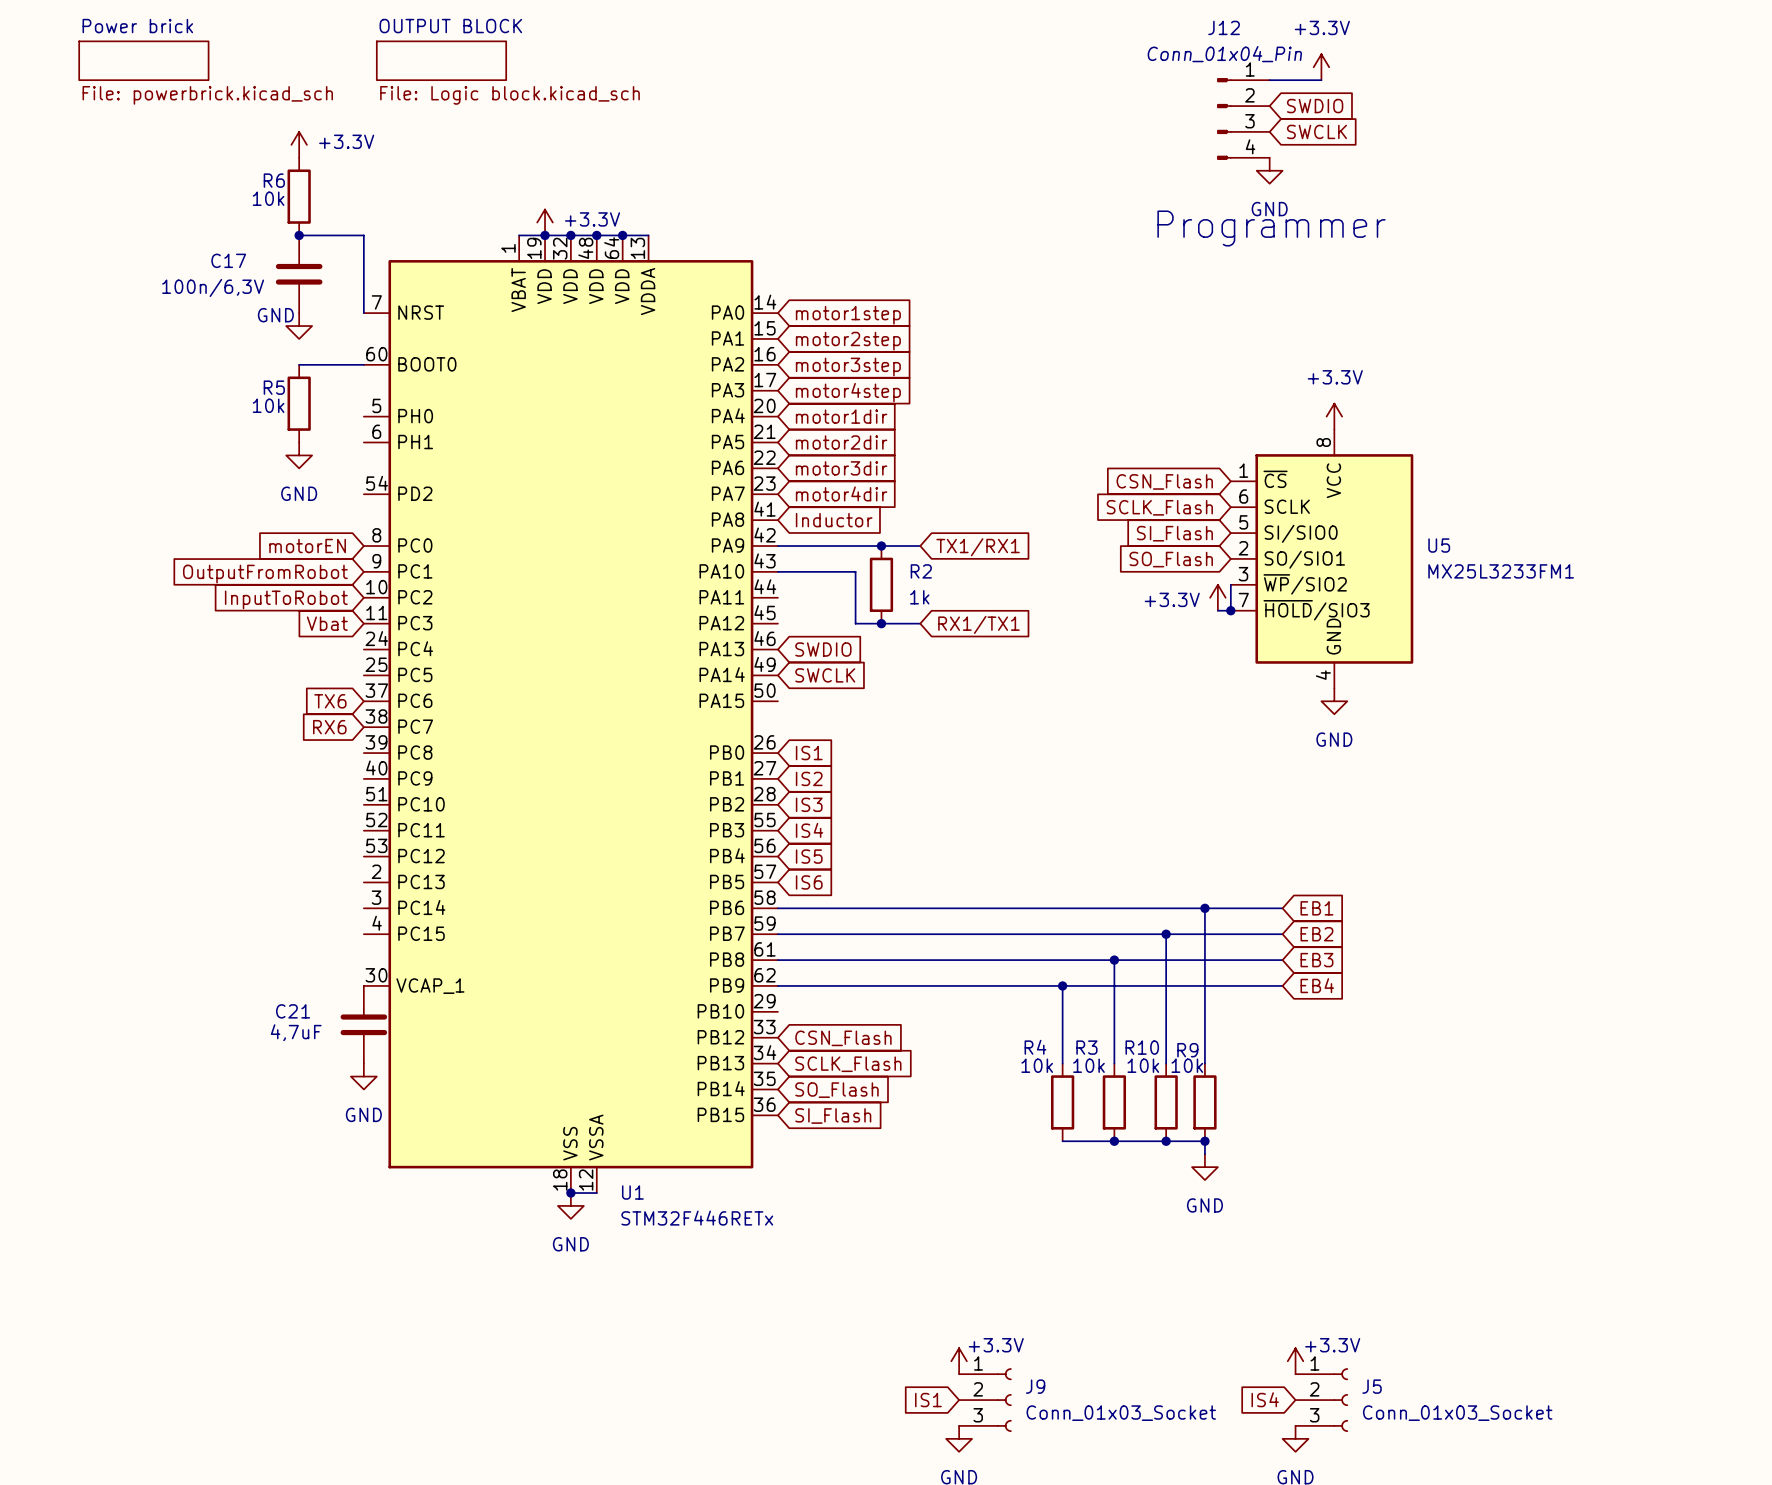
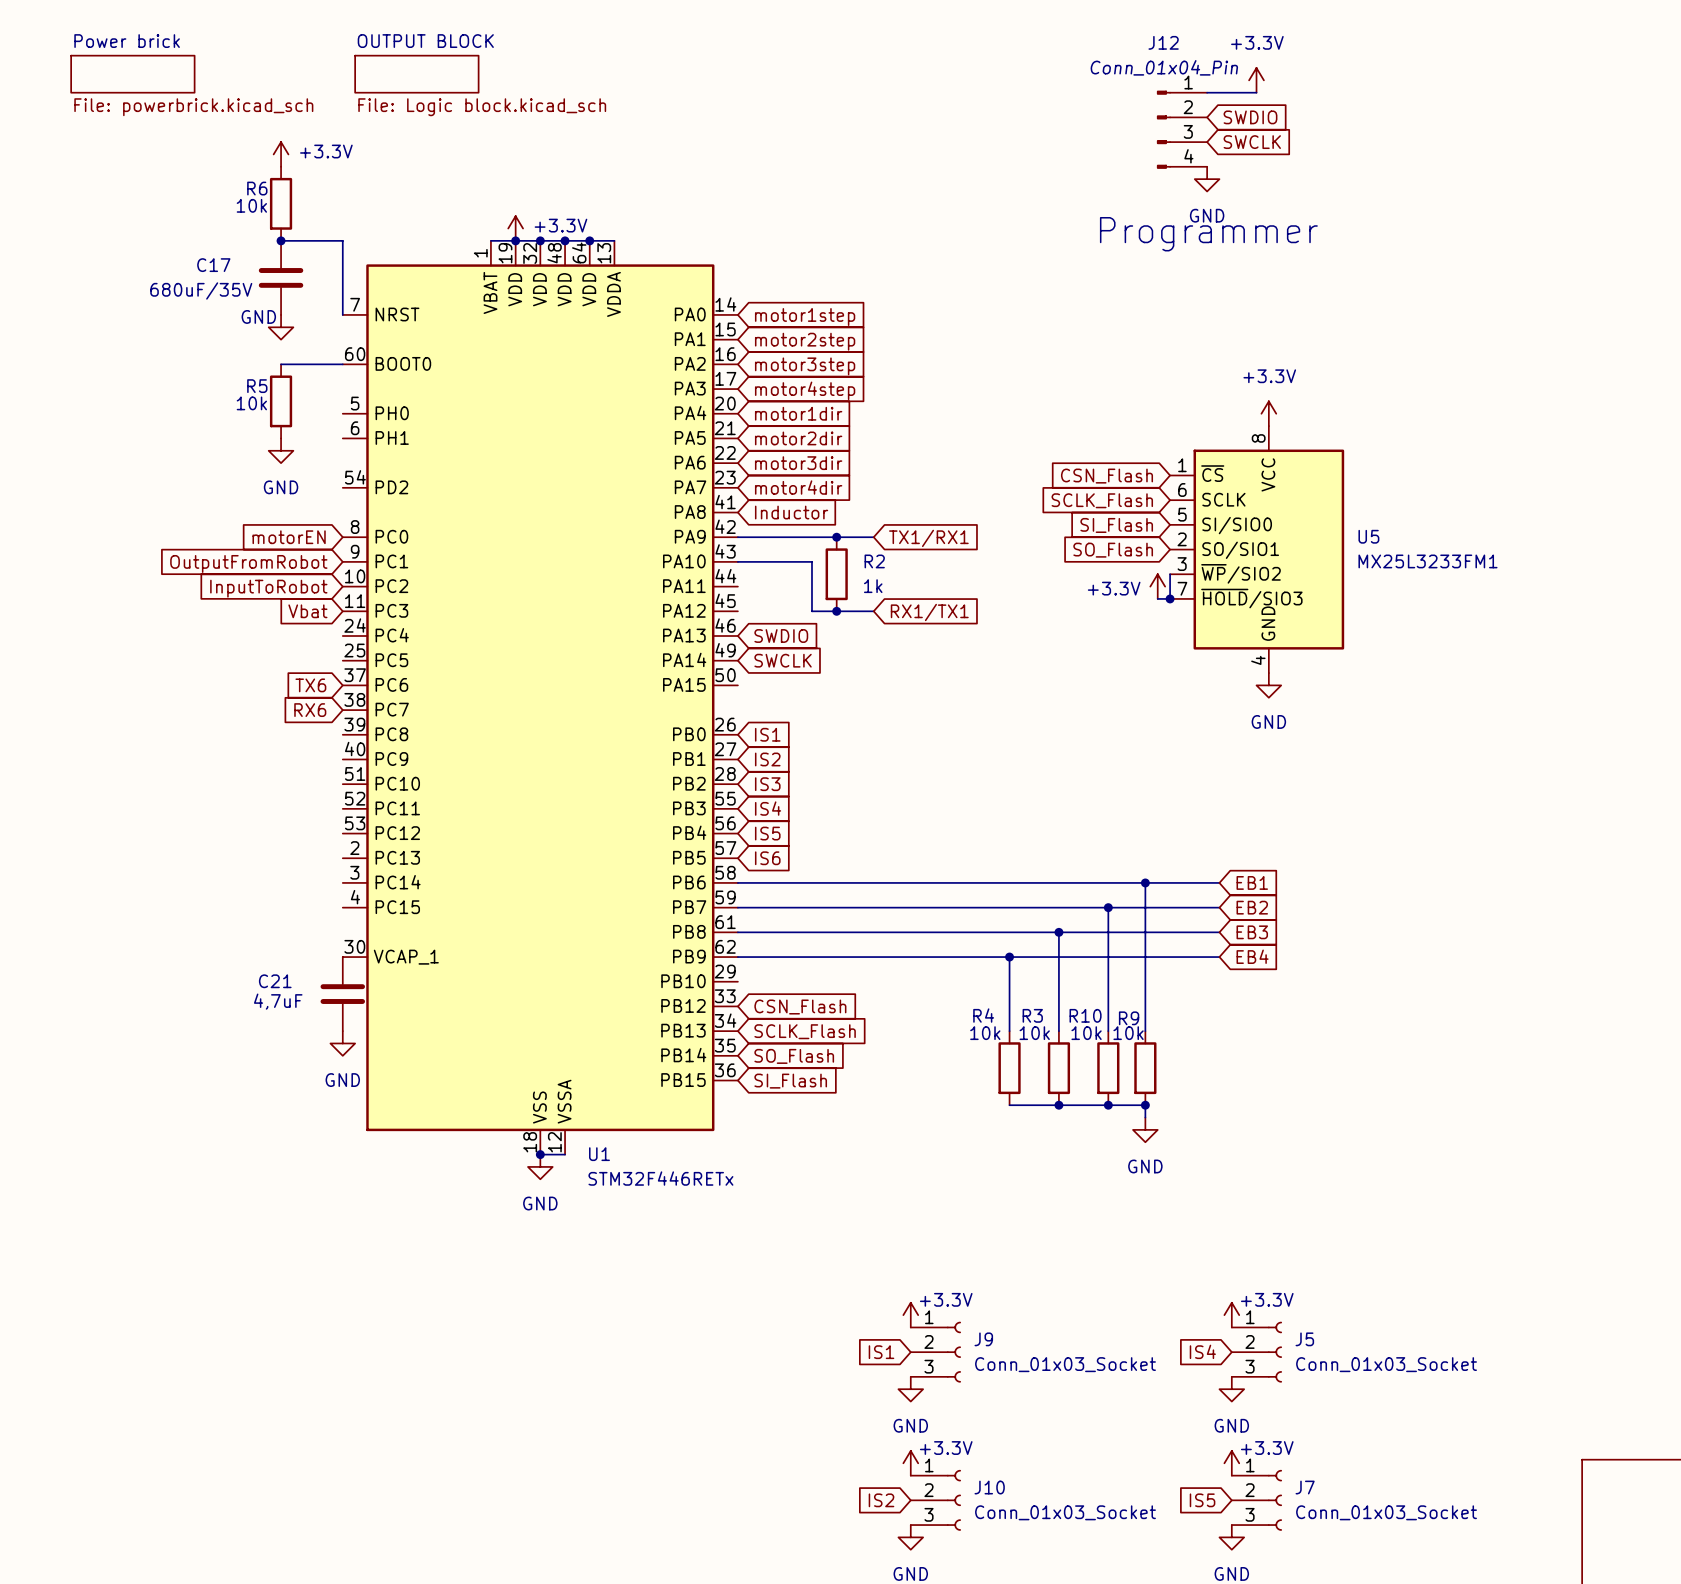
C17 value: 100n/6,3V (213, 287) -> 680uF/35V (201, 290)

